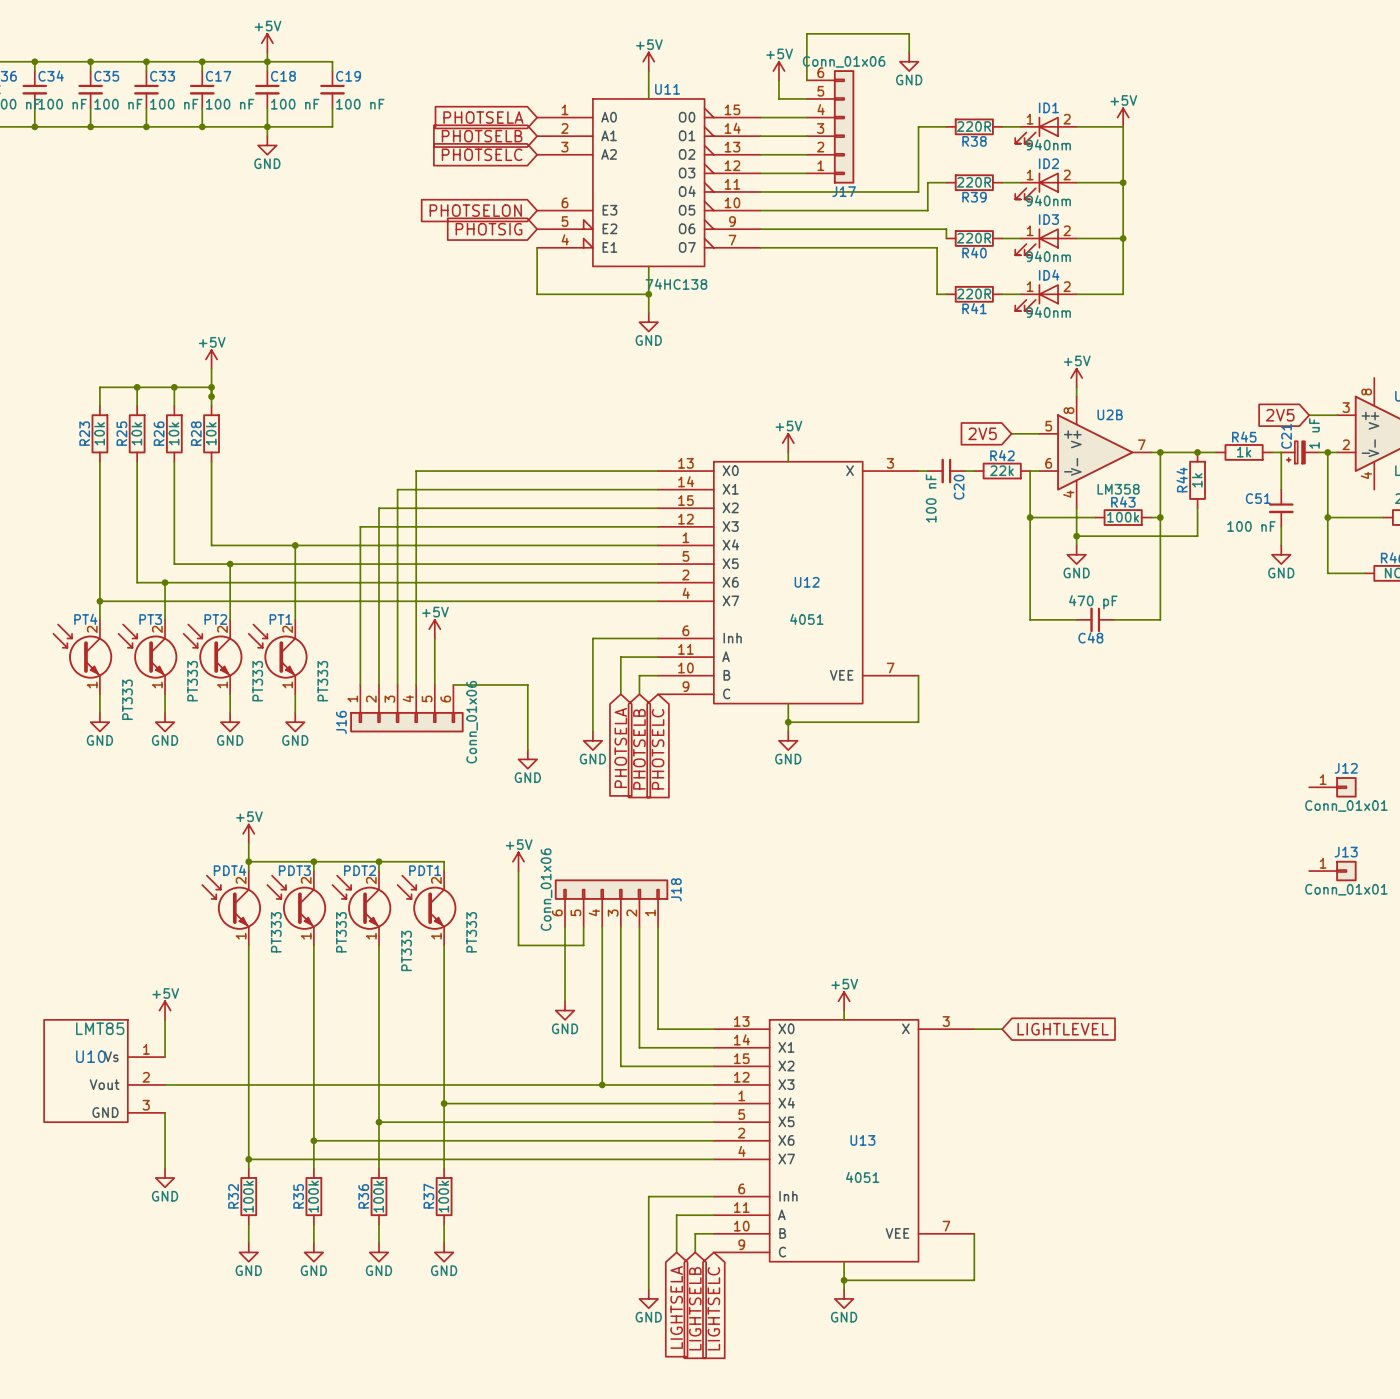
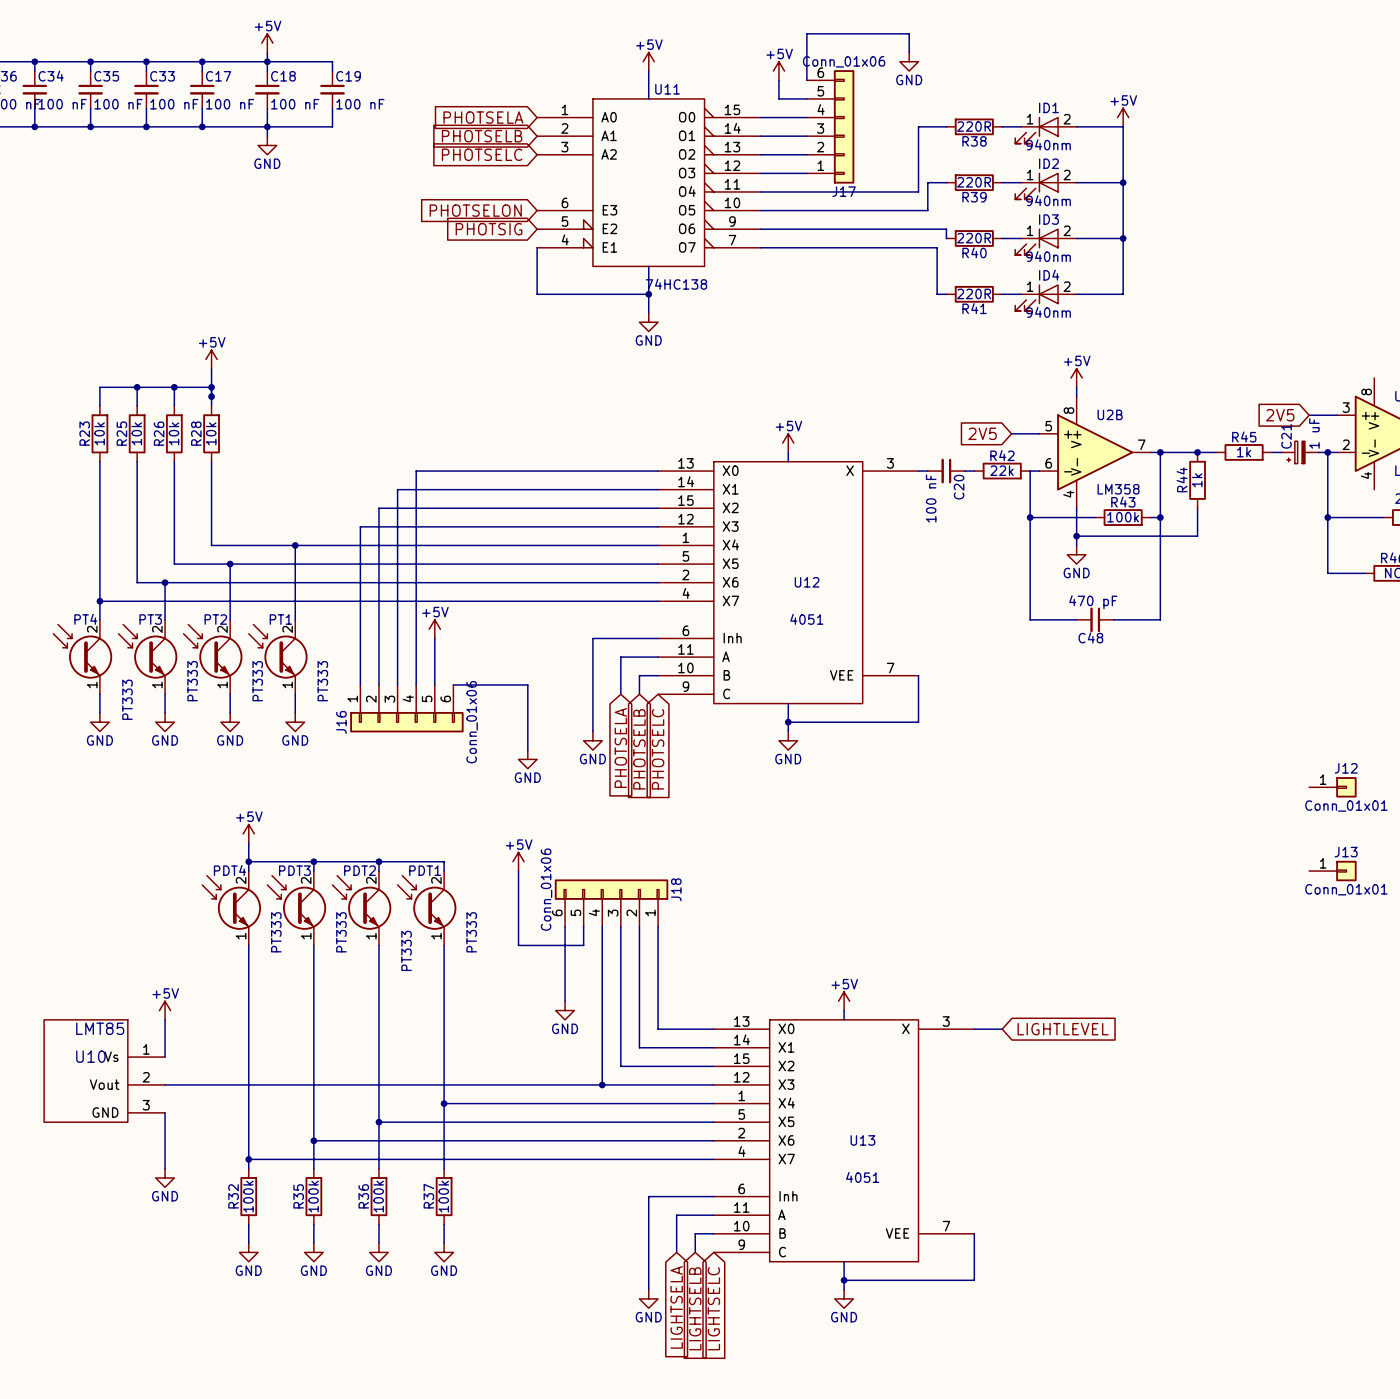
wire: (1281, 452) (1281, 489) -> none
C51: 100 nF (1281, 508) -> none
wire: (1281, 526) (1281, 545) -> none
power symbol: GND (1281, 554) -> none

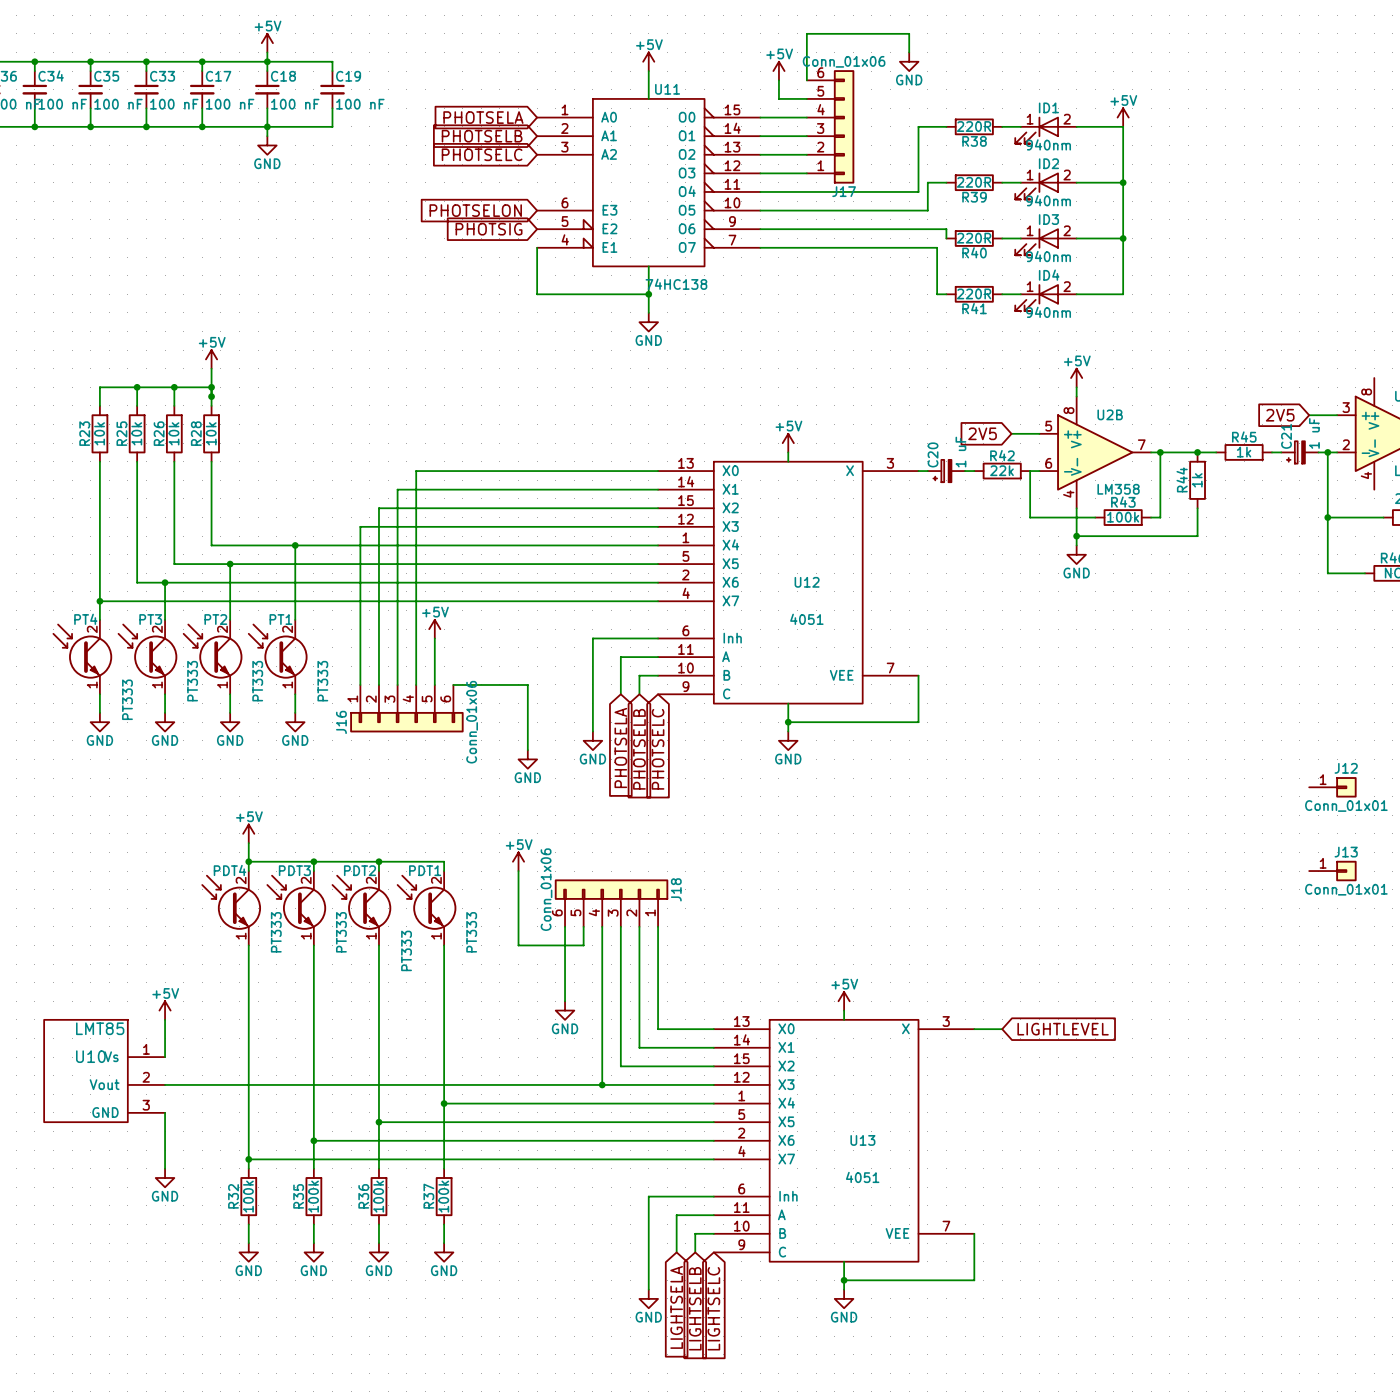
C20 symbol: [927, 458, 966, 484] -> [927, 459, 966, 483]
C20 name position: C20 (959, 487) -> C20 (933, 454)
C20 value: 100 nF (931, 498) -> 1 uF (960, 452)
wire: (1030, 517) (1030, 619) (1076, 619) -> none
junction: (1030, 517) -> none
wire: (1160, 517) (1160, 619) (1113, 619) -> none
junction: (1160, 517) -> none
C48: 470 pF (1095, 619) -> none

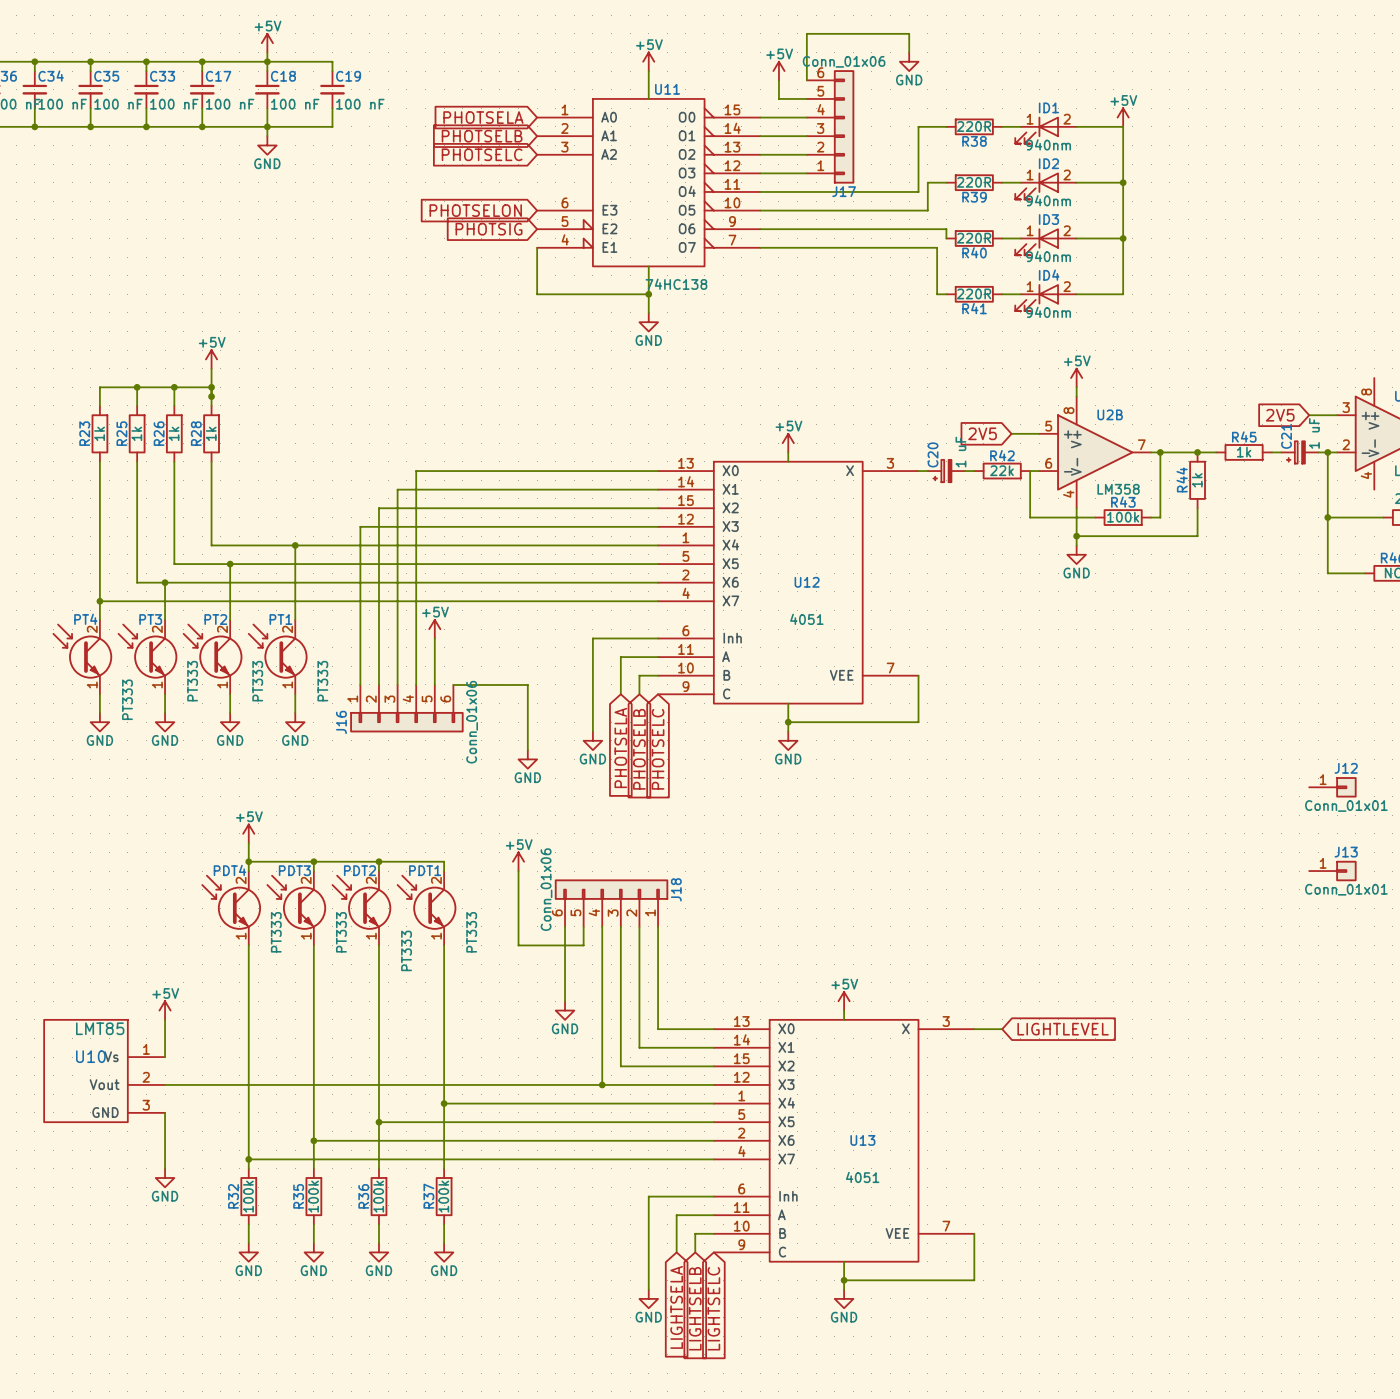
R23 value: 10k (99, 433) -> 1k (99, 433)
R25 value: 10k (136, 433) -> 1k (136, 433)
R26 value: 10k (173, 433) -> 1k (173, 433)
R28 value: 10k (211, 433) -> 1k (211, 433)

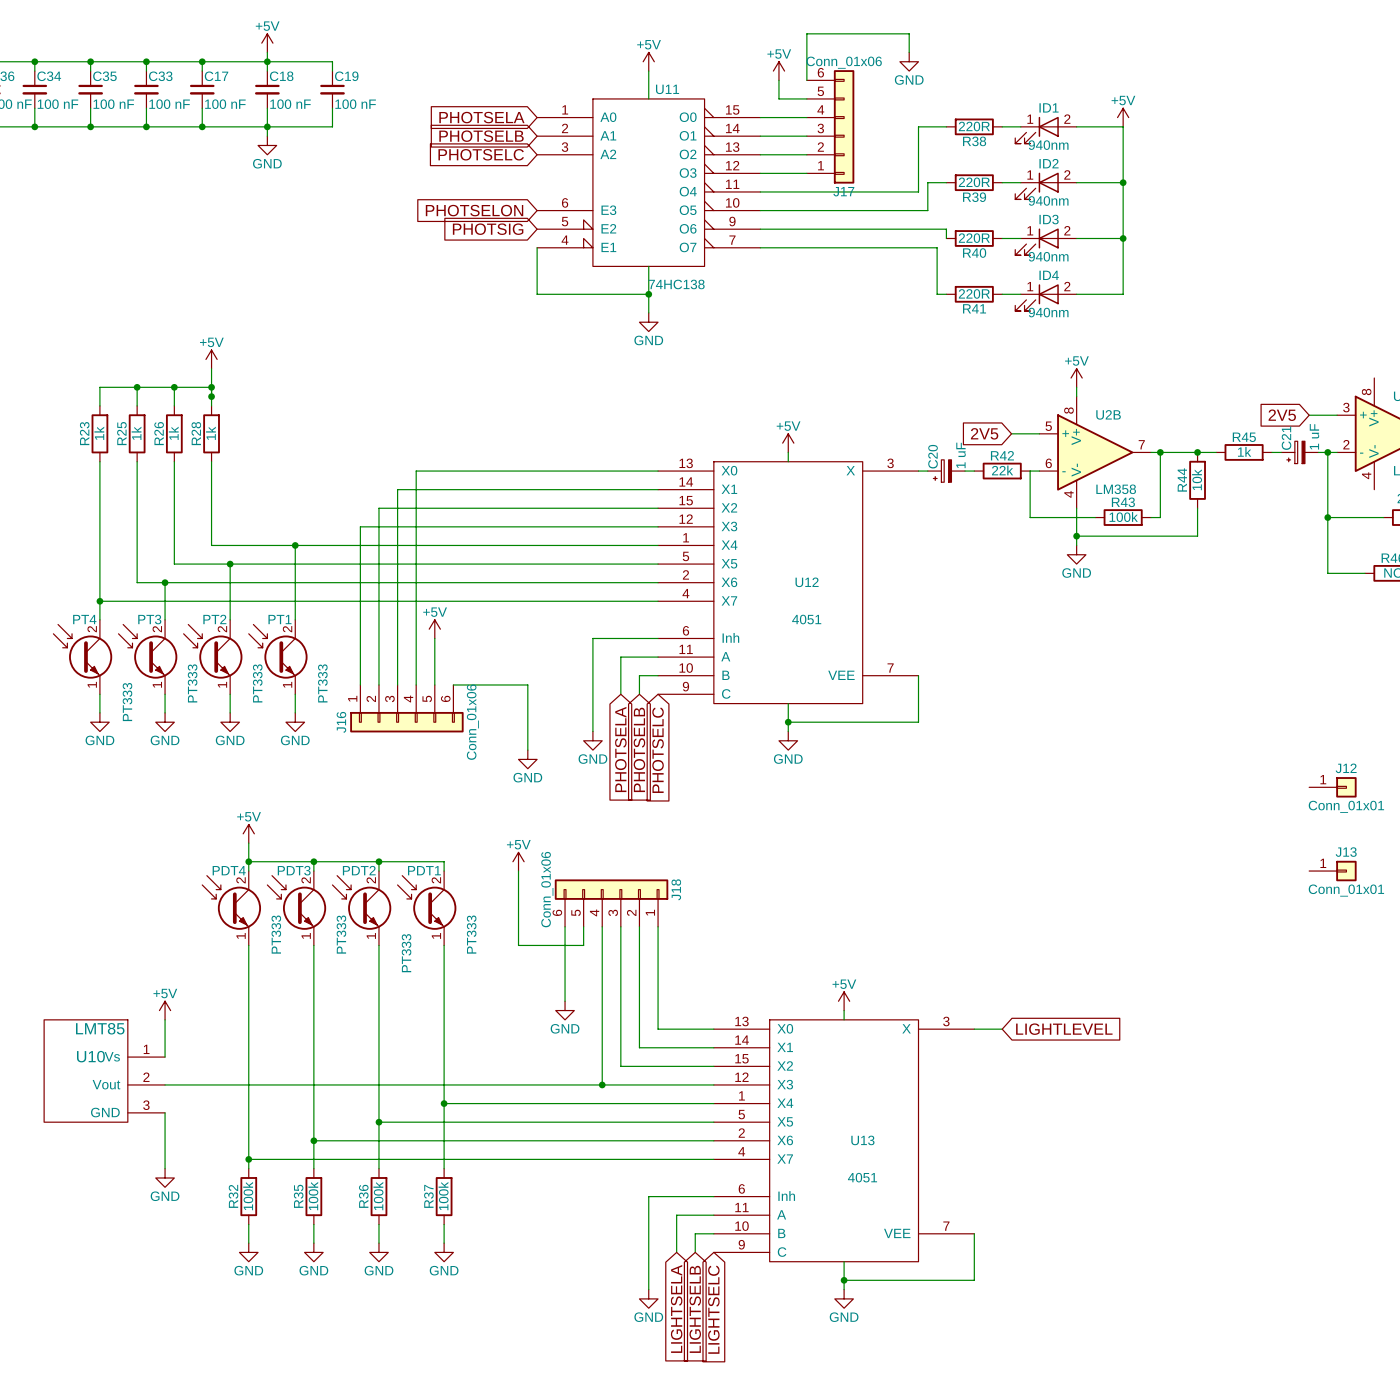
R44 value: 1k (1197, 480) -> 10k (1197, 479)

